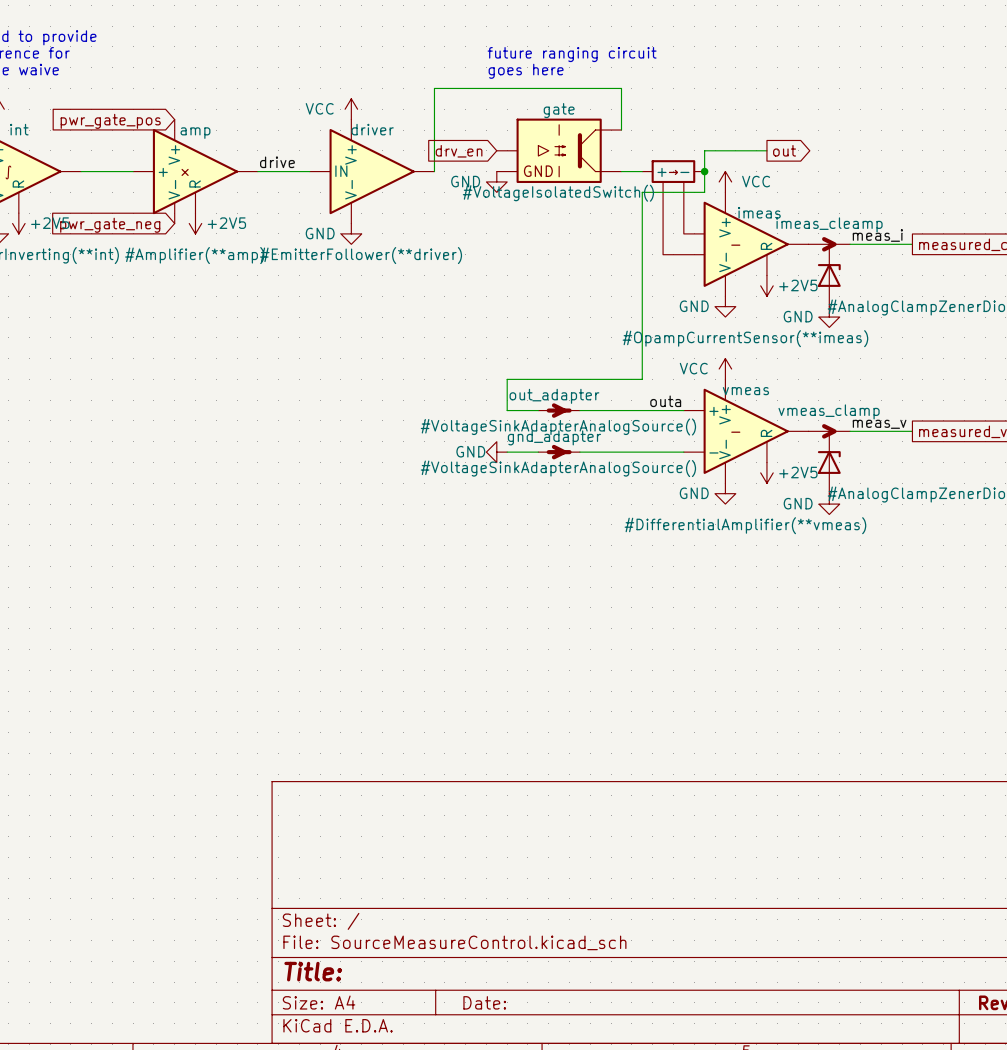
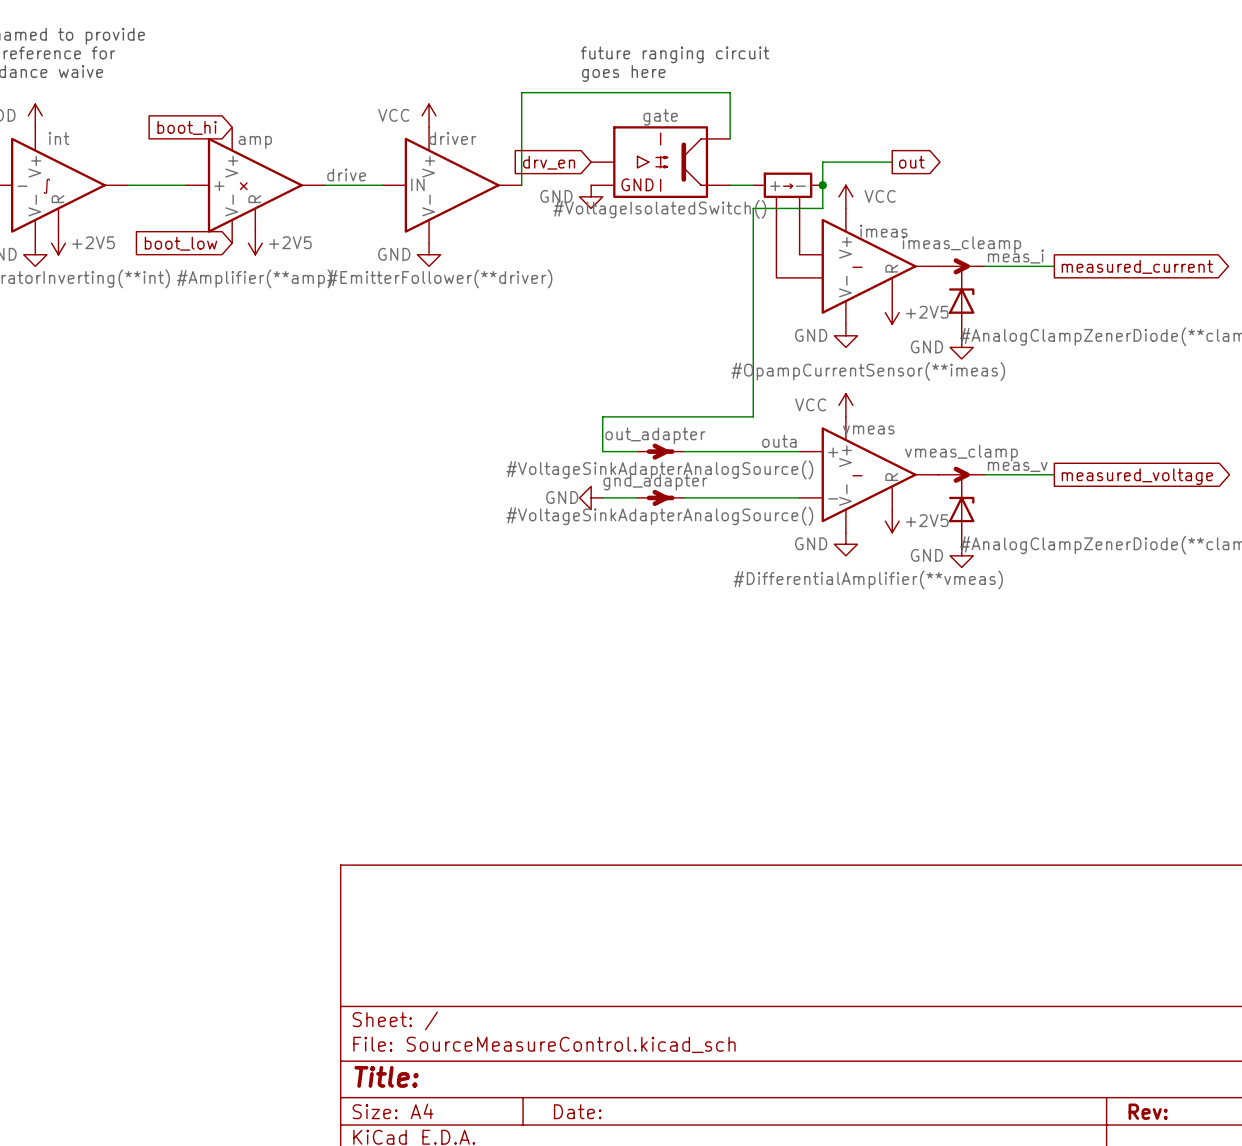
global label: pwr_gate_pos (110, 121) -> boot_hi (187, 127)
global label: pwr_gate_neg (110, 225) -> boot_low (181, 243)

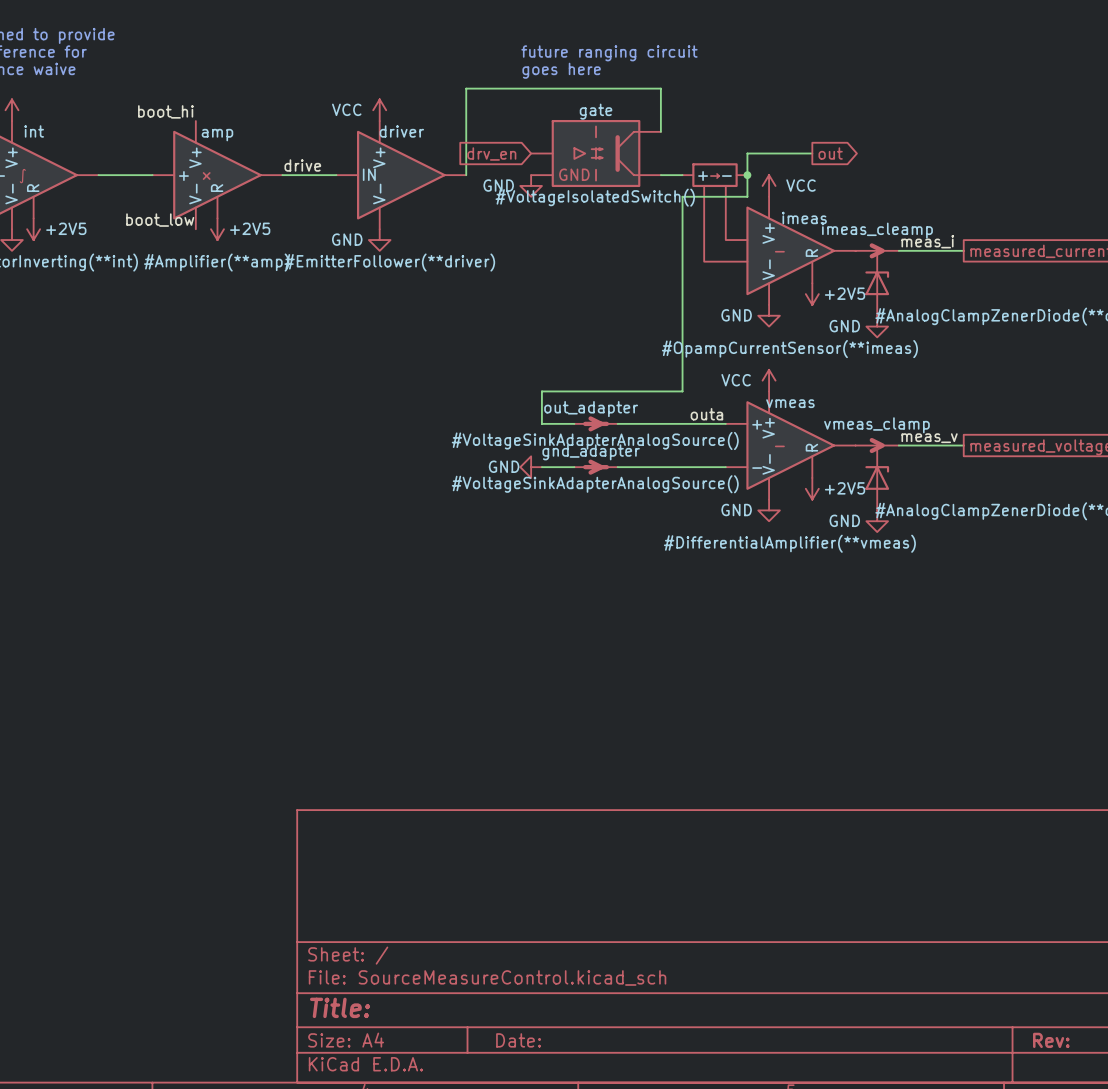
label: none -> boot_hi (165, 111)
global label: boot_hi (187, 127) -> none
label: none -> boot_low (160, 220)
global label: boot_low (181, 243) -> none

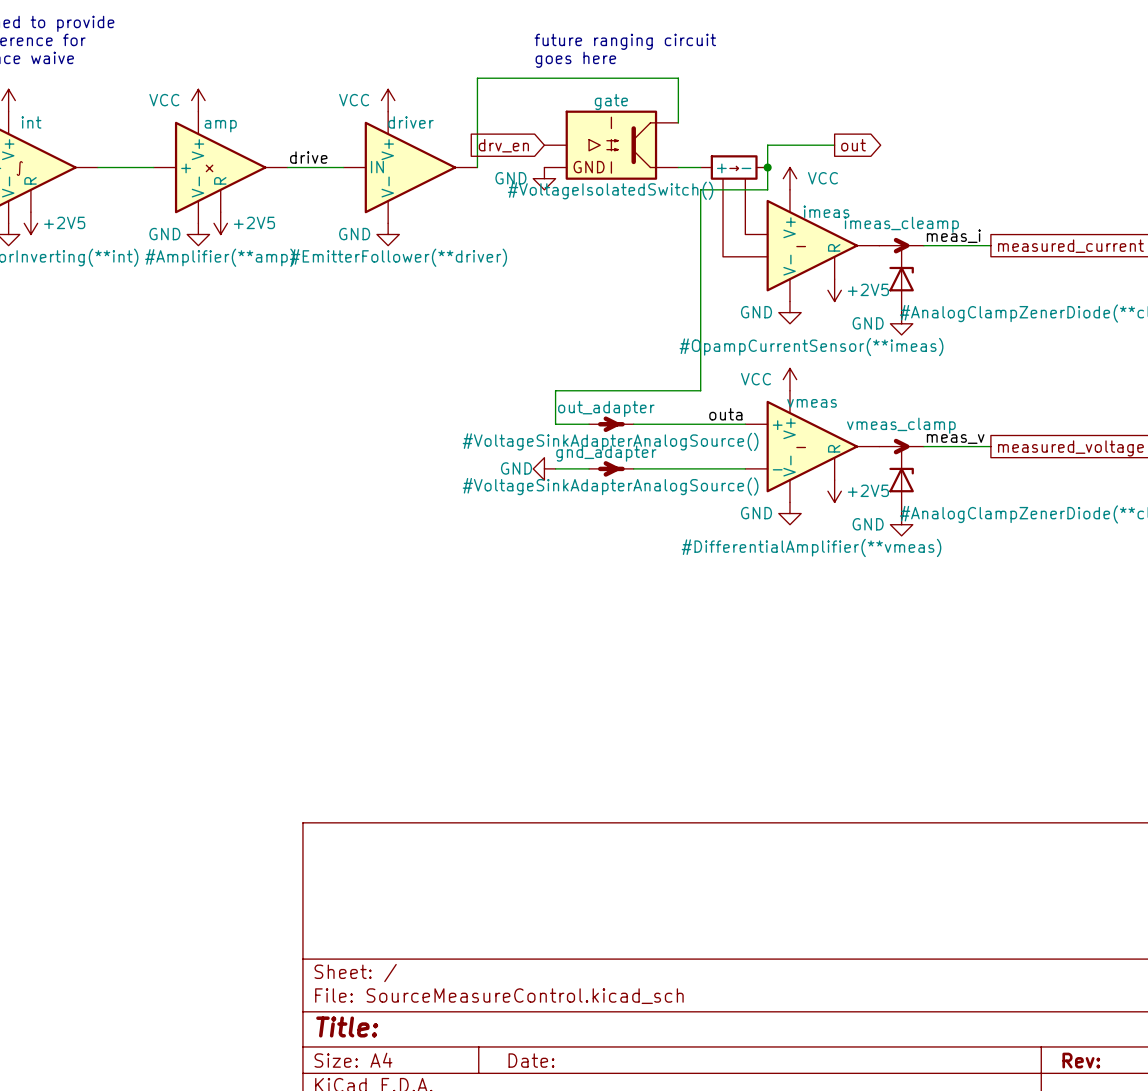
power symbol: none -> VCC (198, 100)
label: boot_hi (165, 111) -> none
label: boot_low (160, 220) -> none
power symbol: none -> GND (198, 234)

